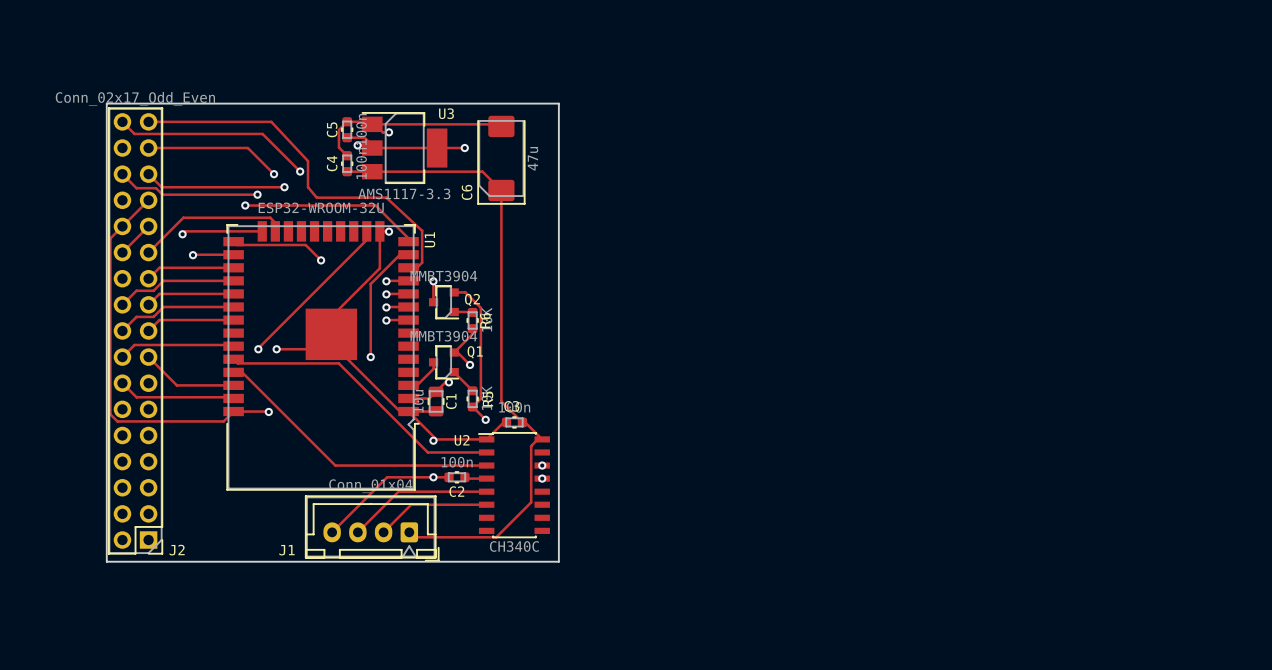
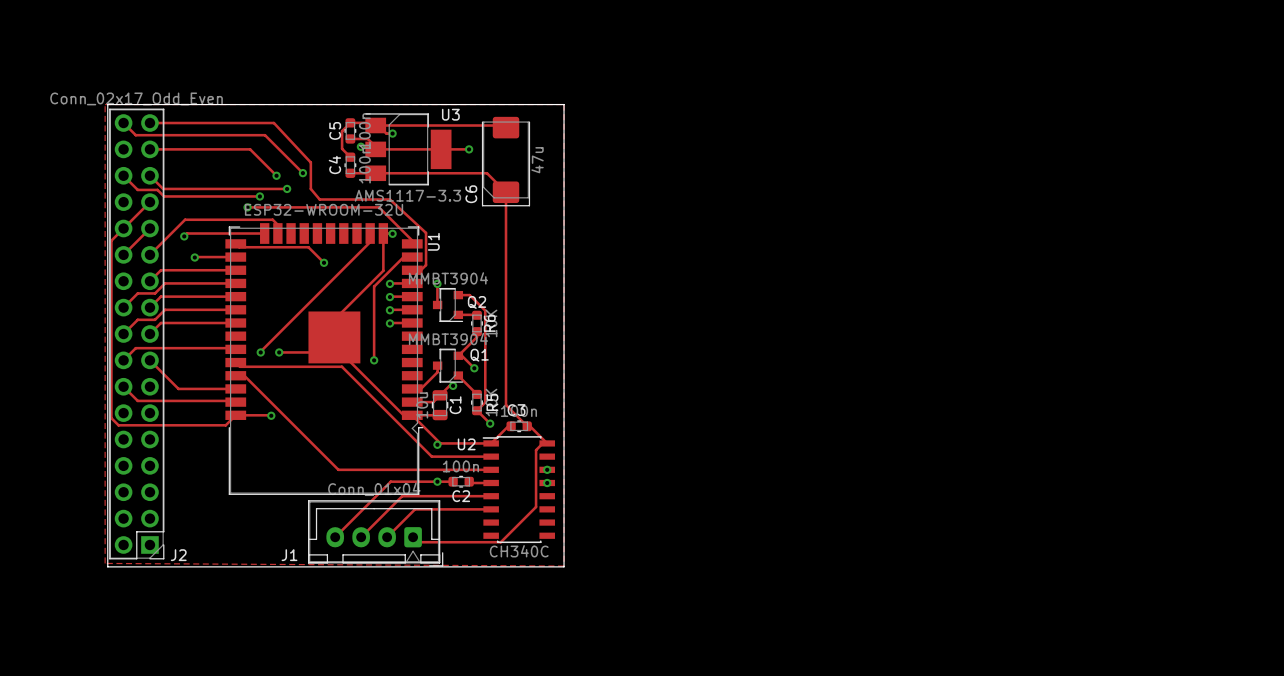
zone outline: none -> (105, 104) (105, 563) (564, 566) (564, 104) (105, 104)

